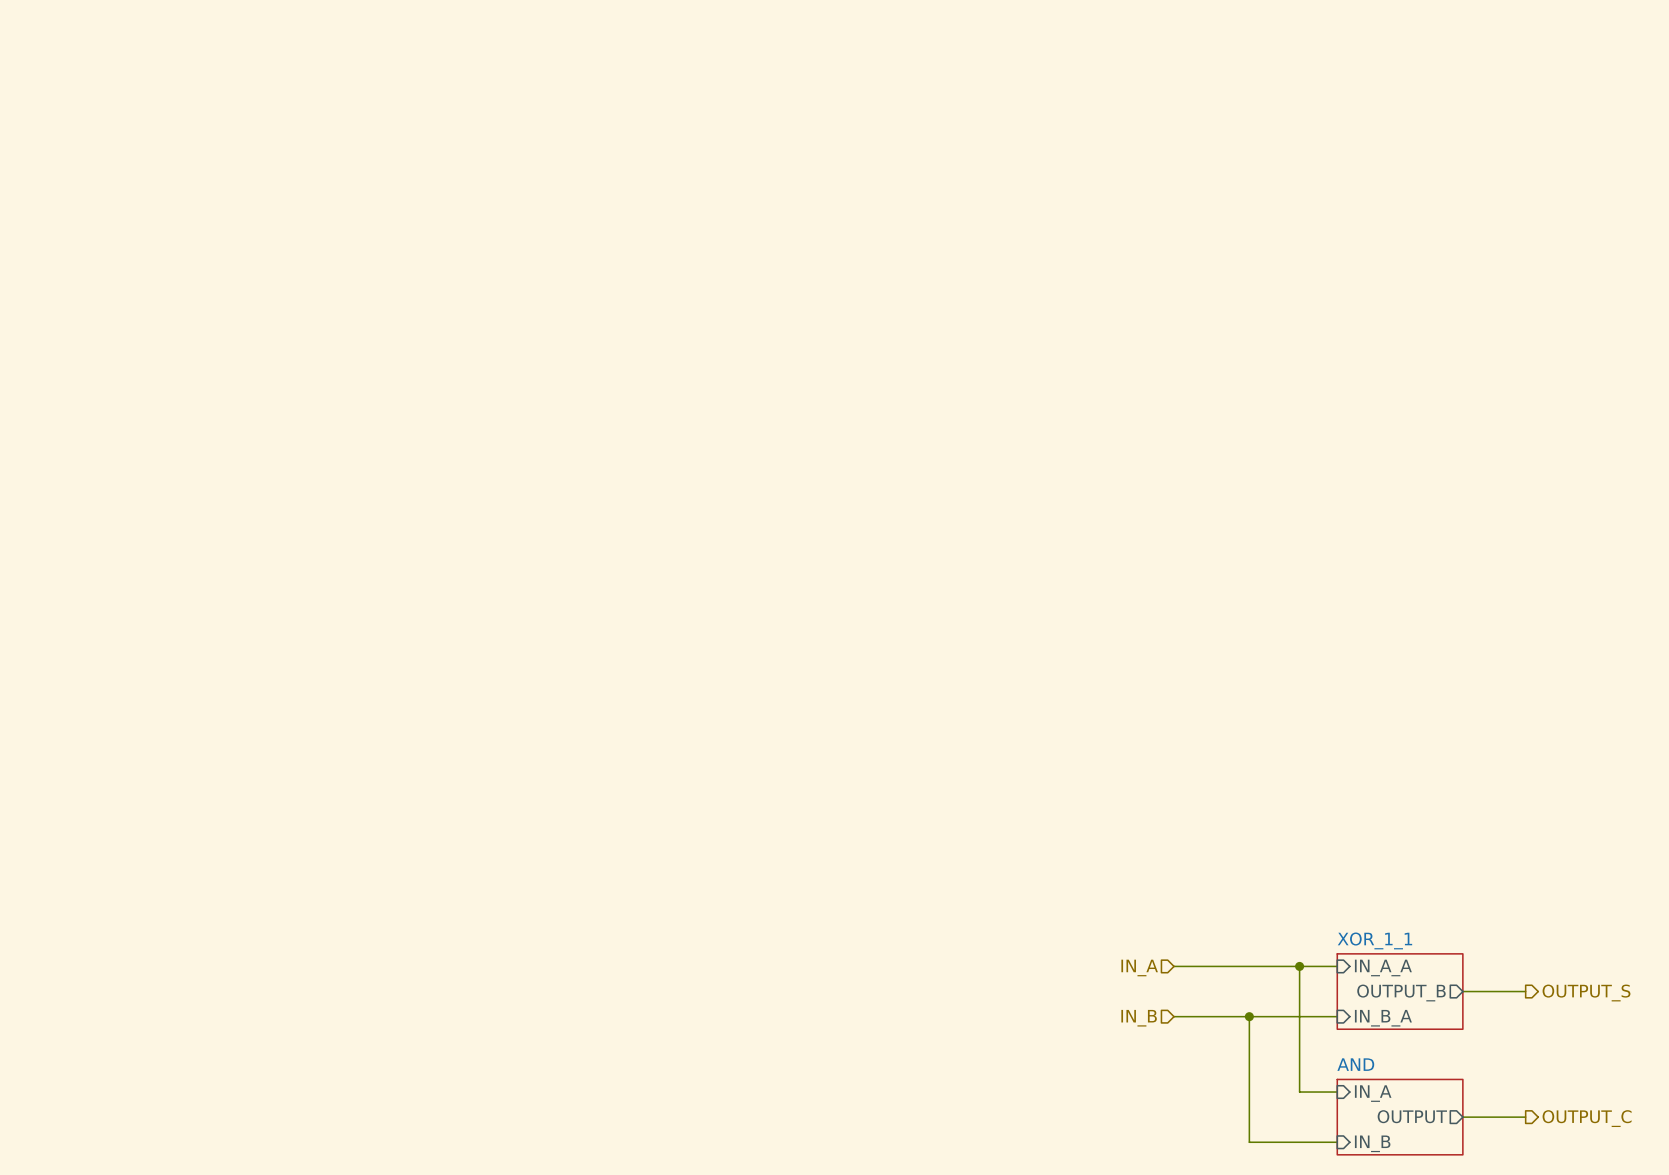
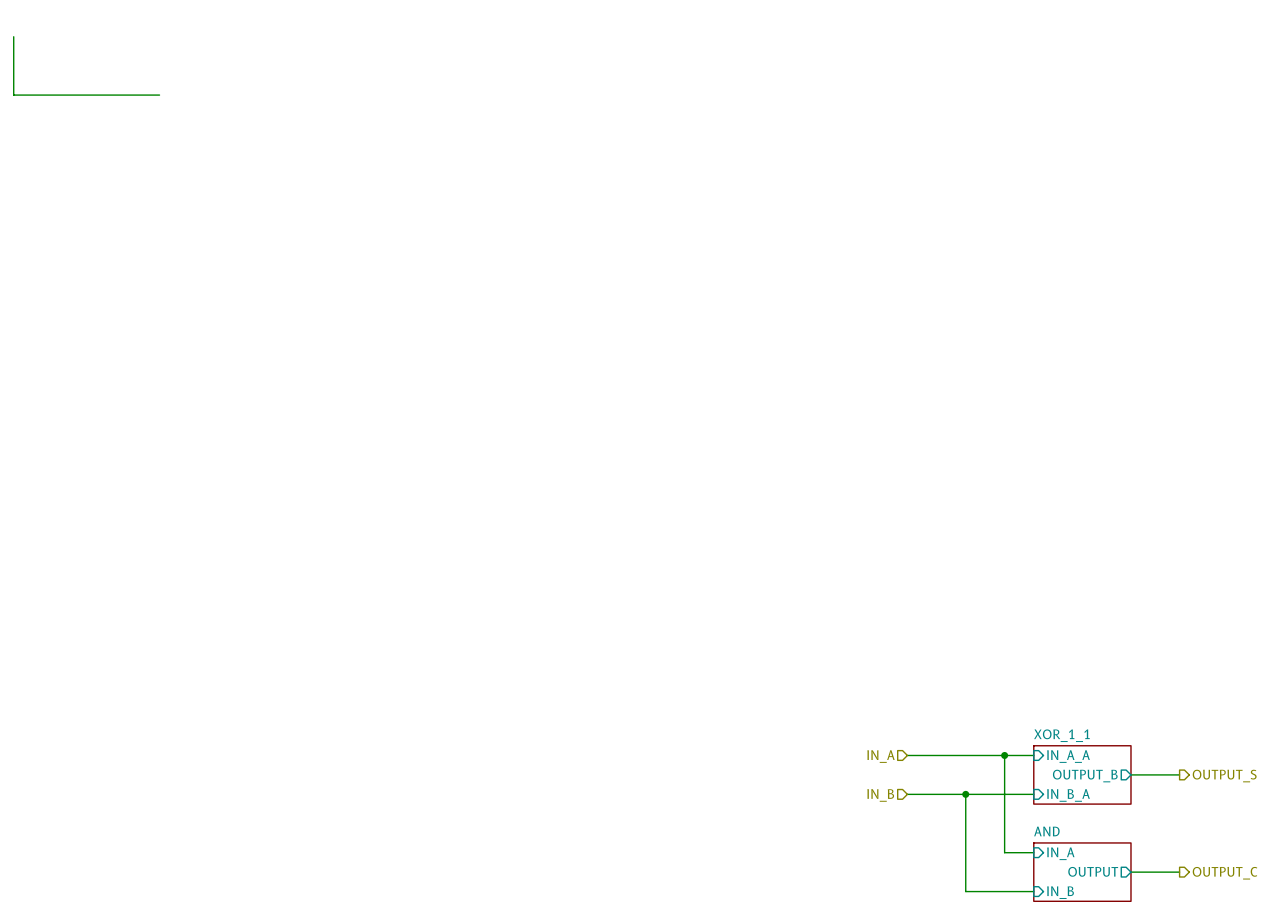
wire: none -> (13, 36) (13, 95) (159, 95)

